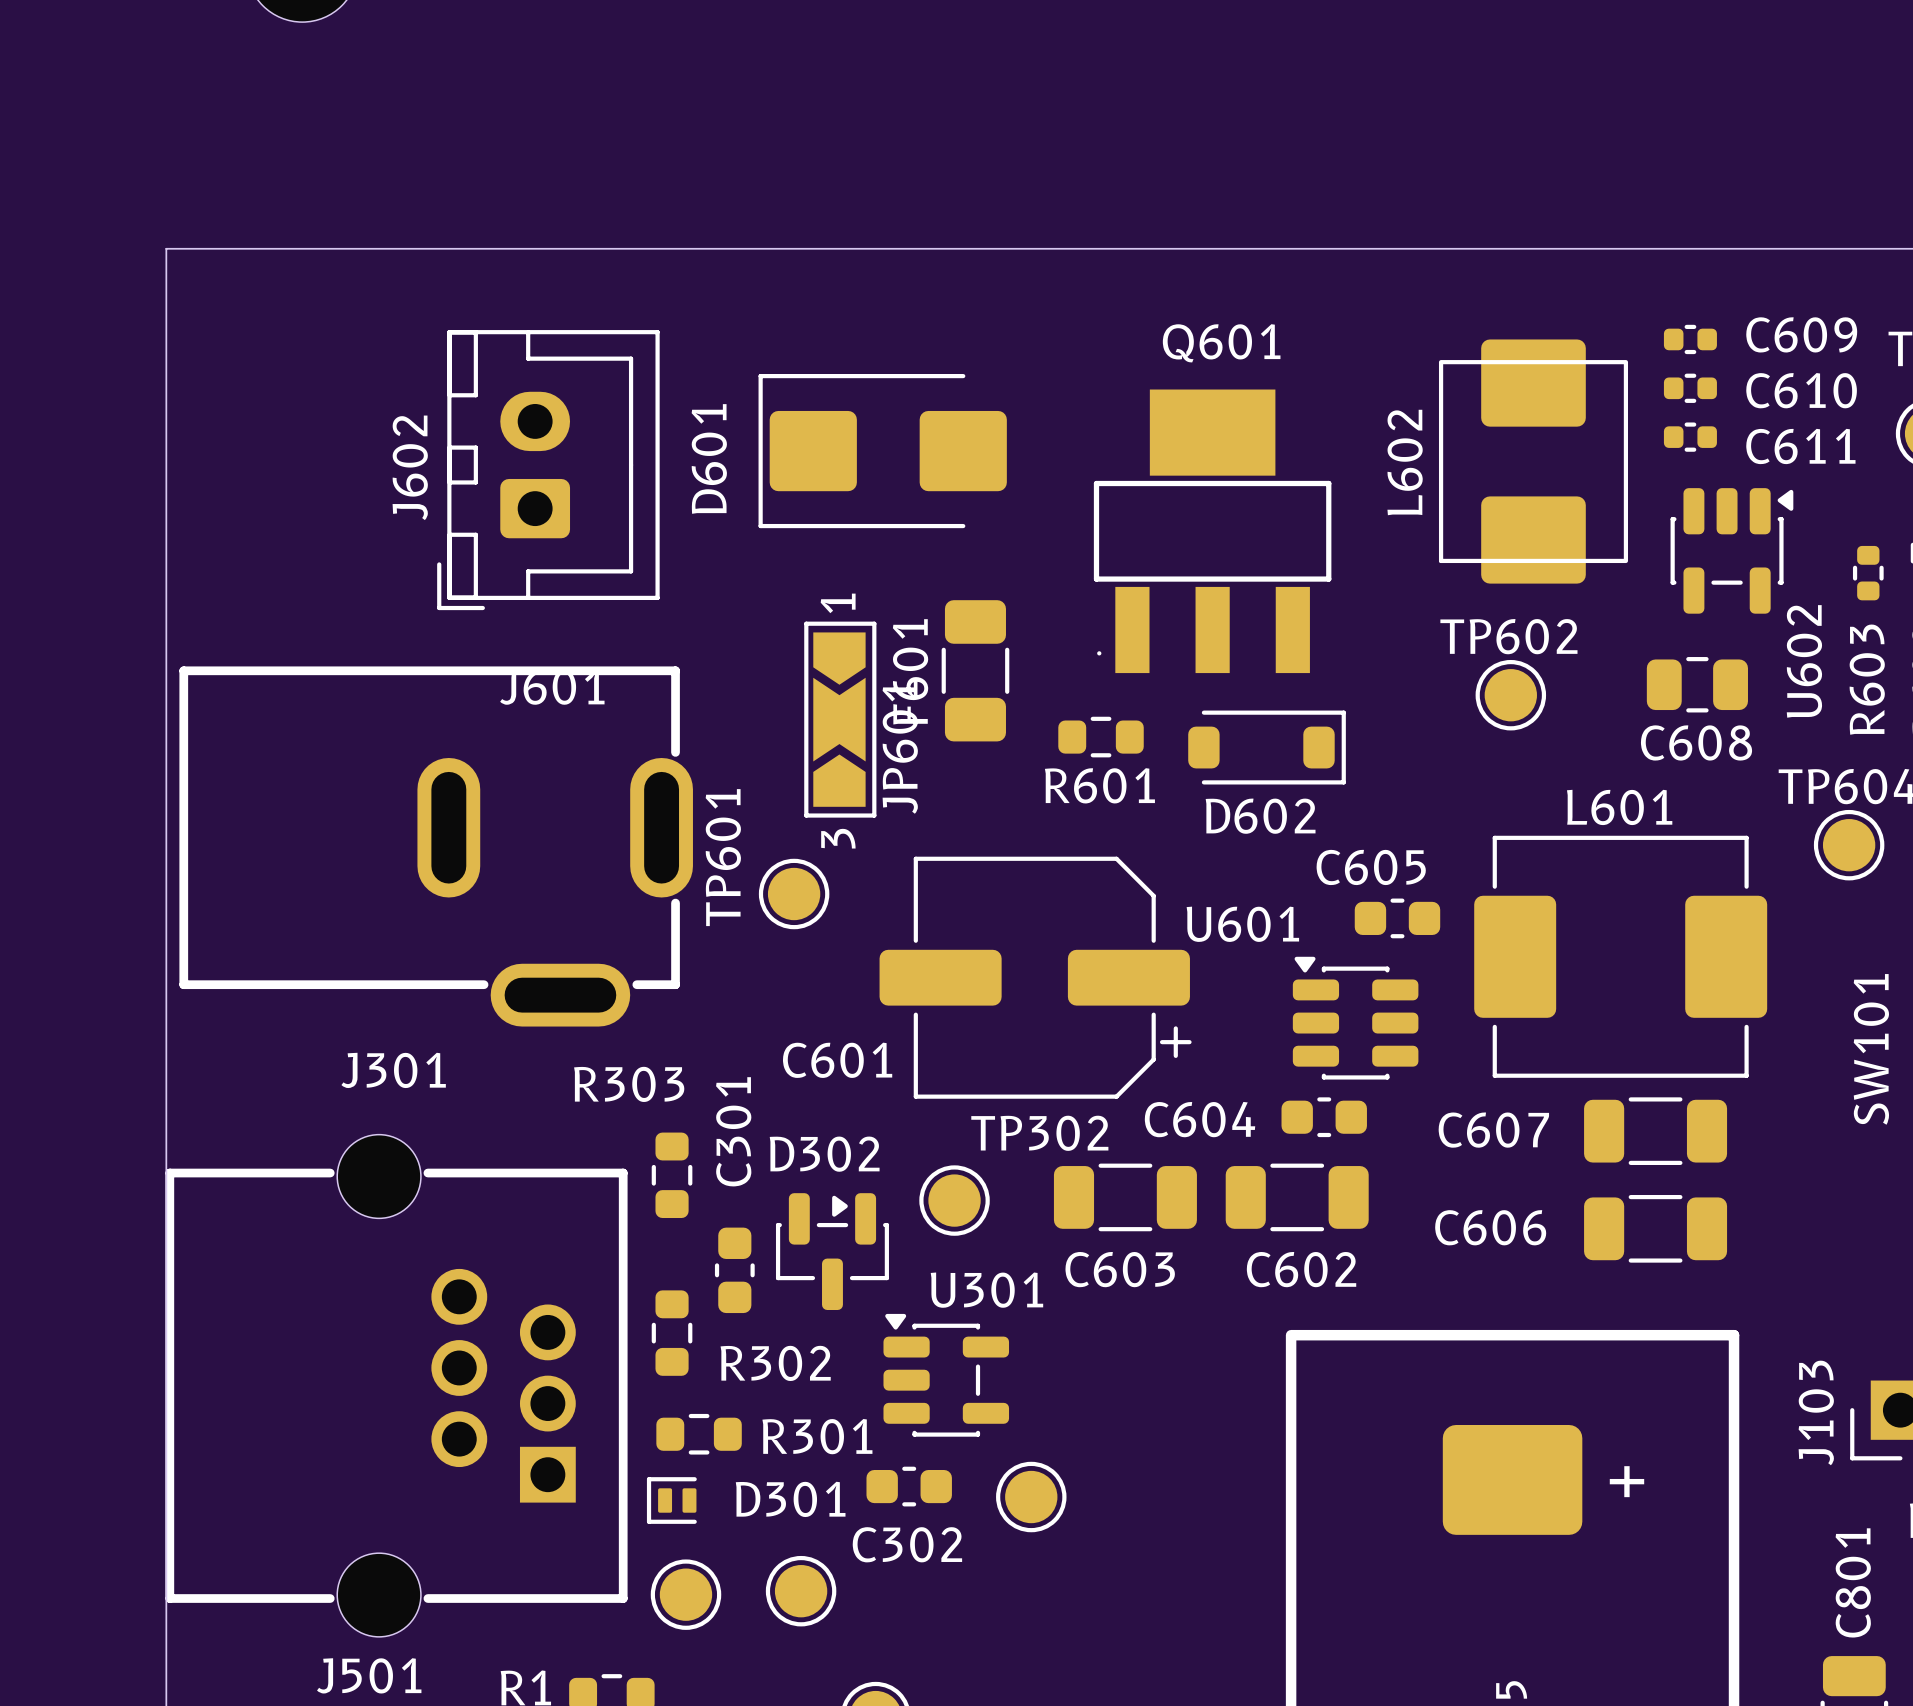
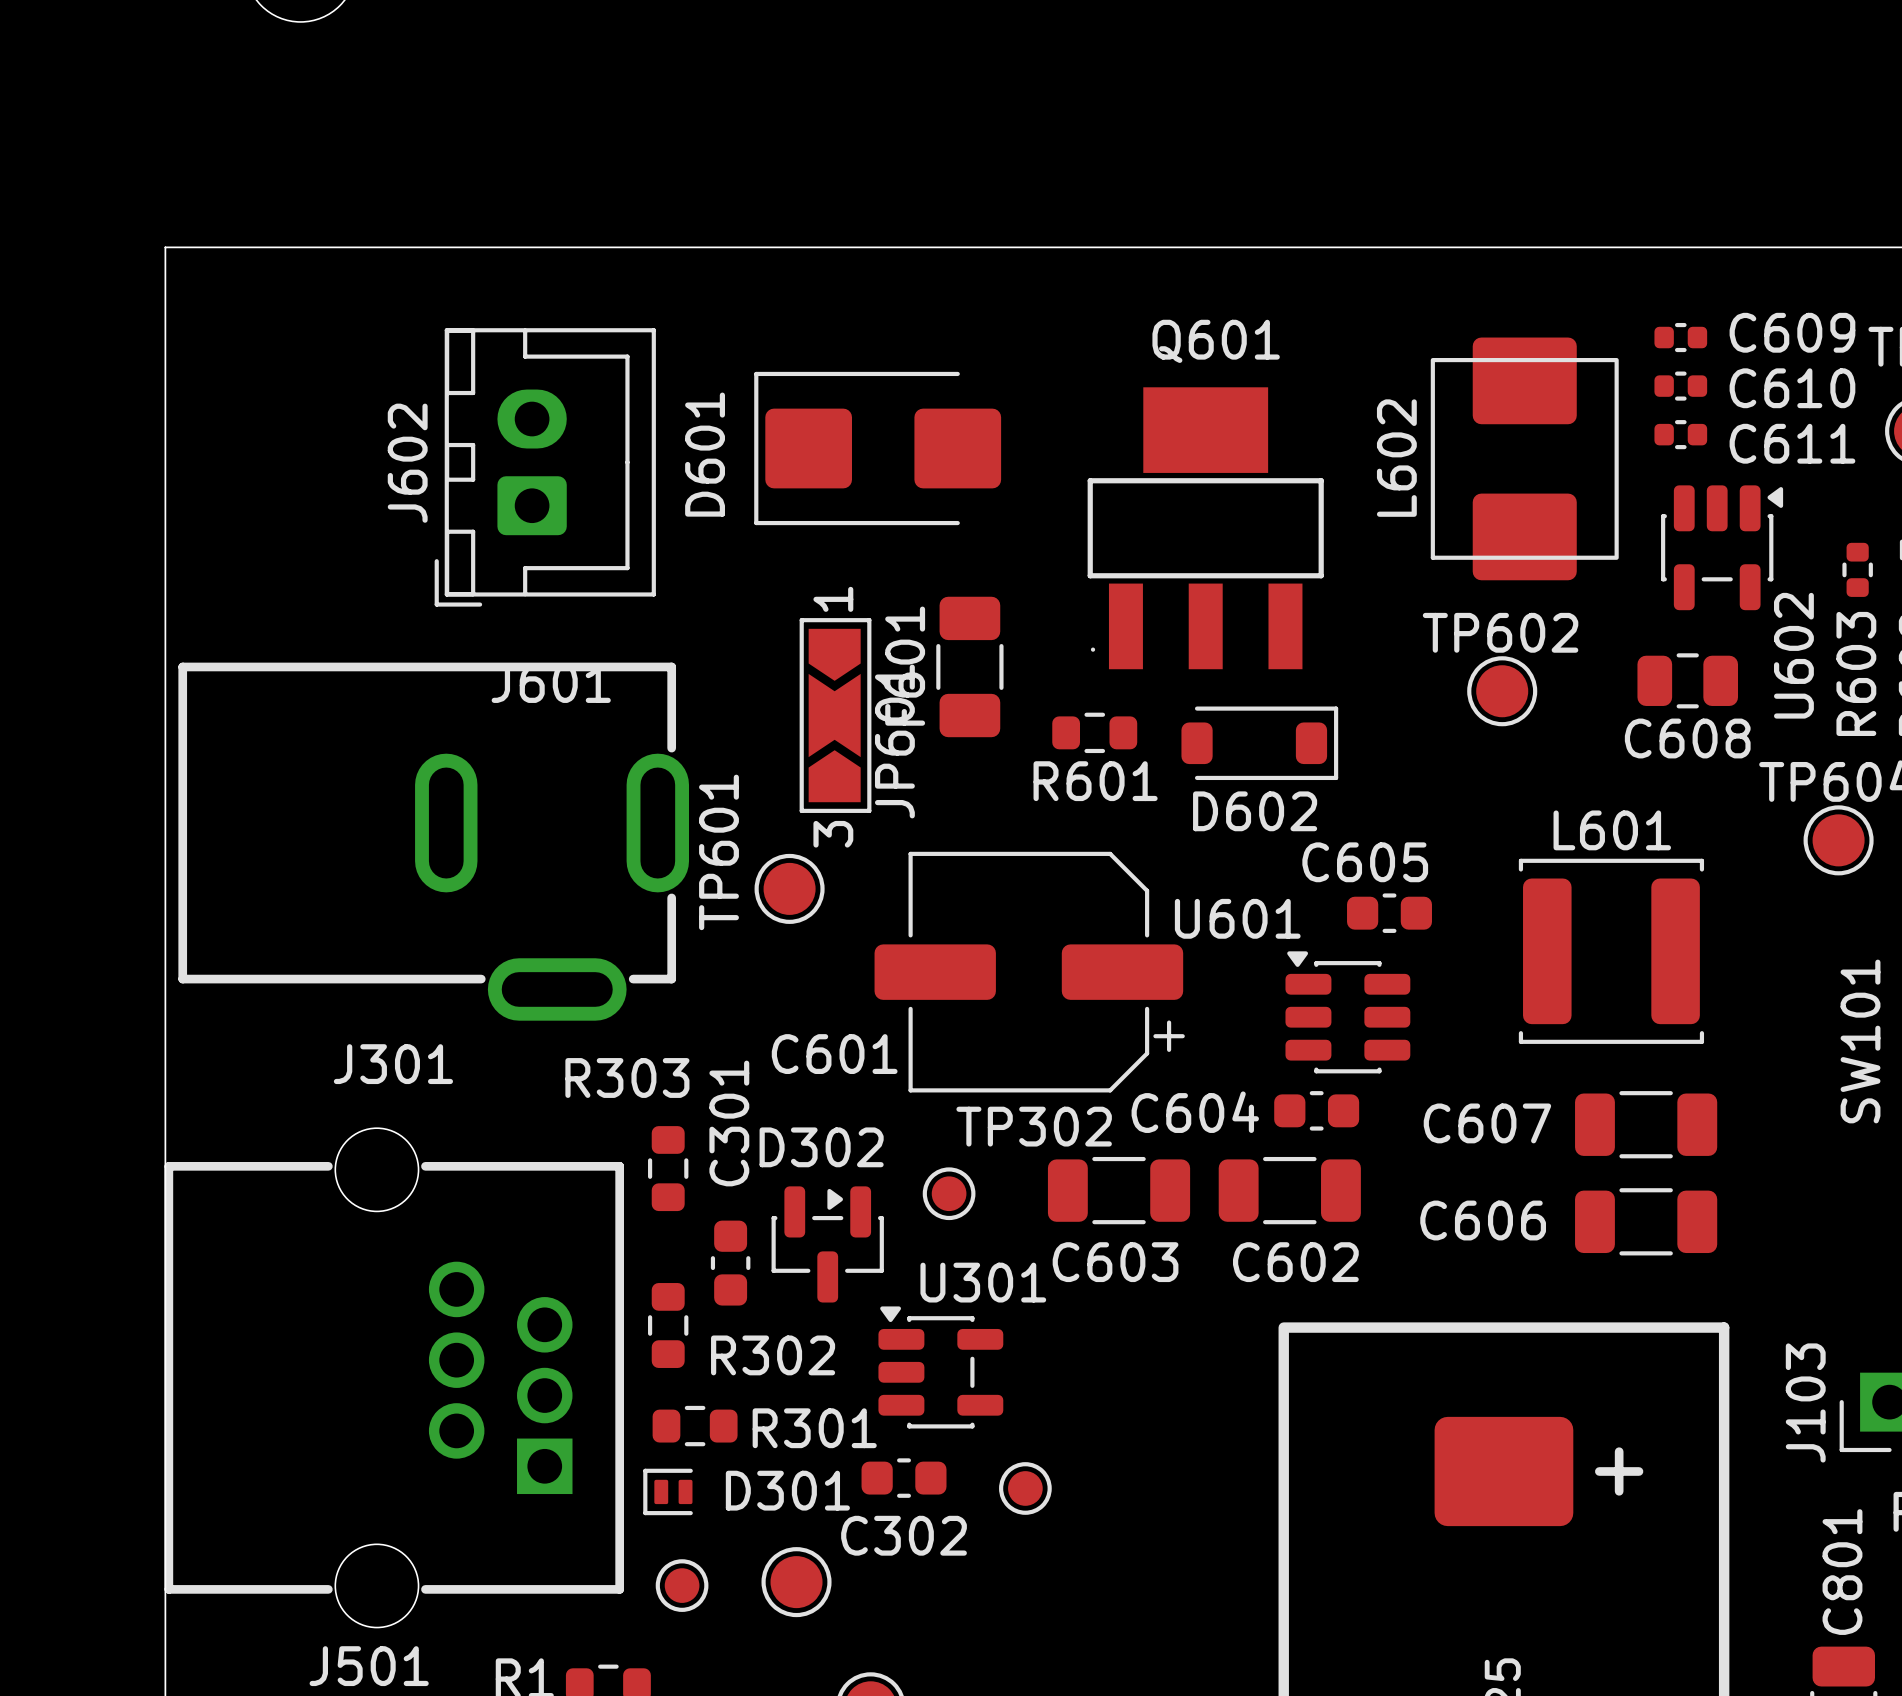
L601 footprint: [1474, 835, 1768, 1078] -> [1518, 858, 1705, 1044]
TP302 footprint: [919, 1165, 990, 1236] -> [922, 1167, 976, 1221]
part footprint: [996, 1461, 1067, 1533] -> [999, 1462, 1052, 1515]
part footprint: [650, 1559, 722, 1630] -> [655, 1559, 709, 1612]

